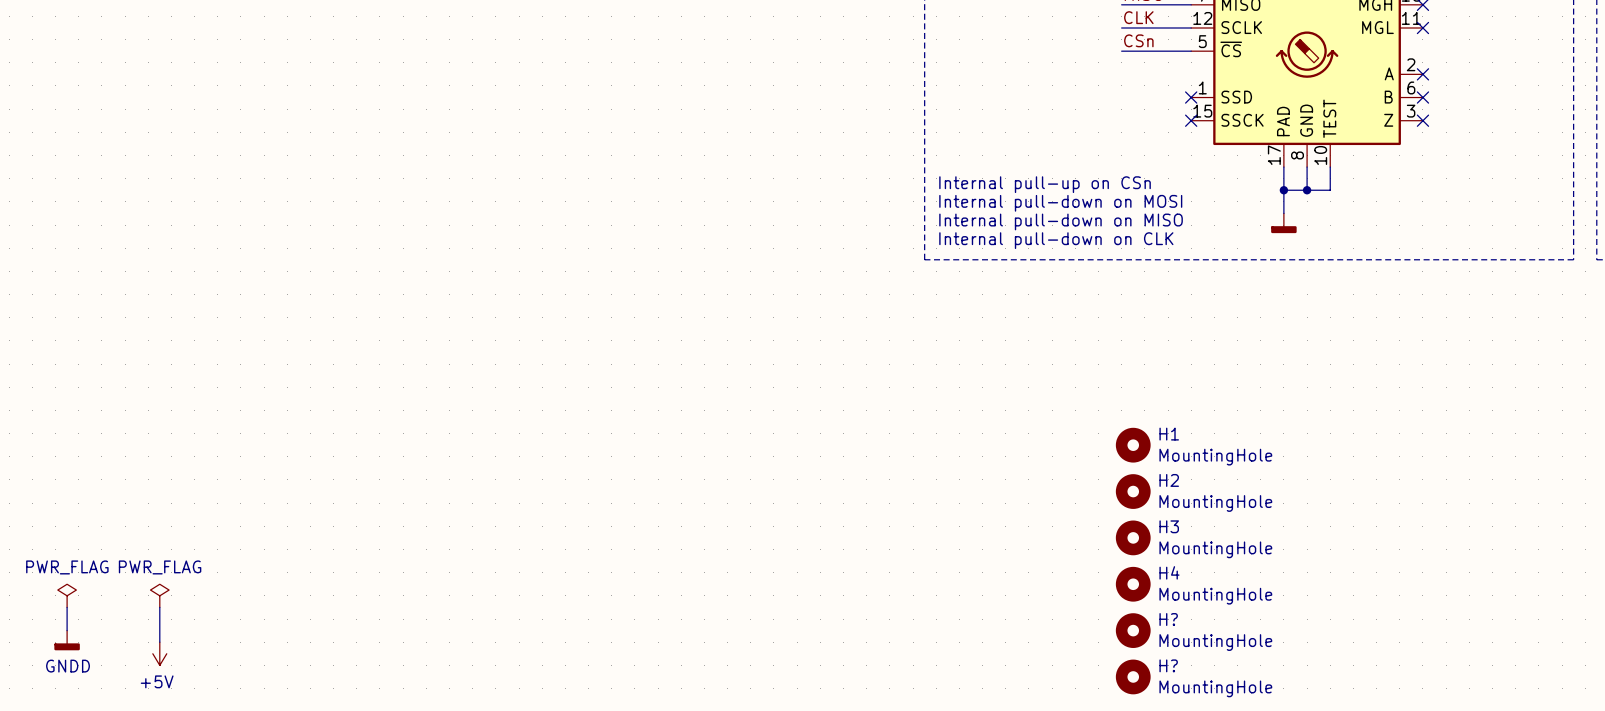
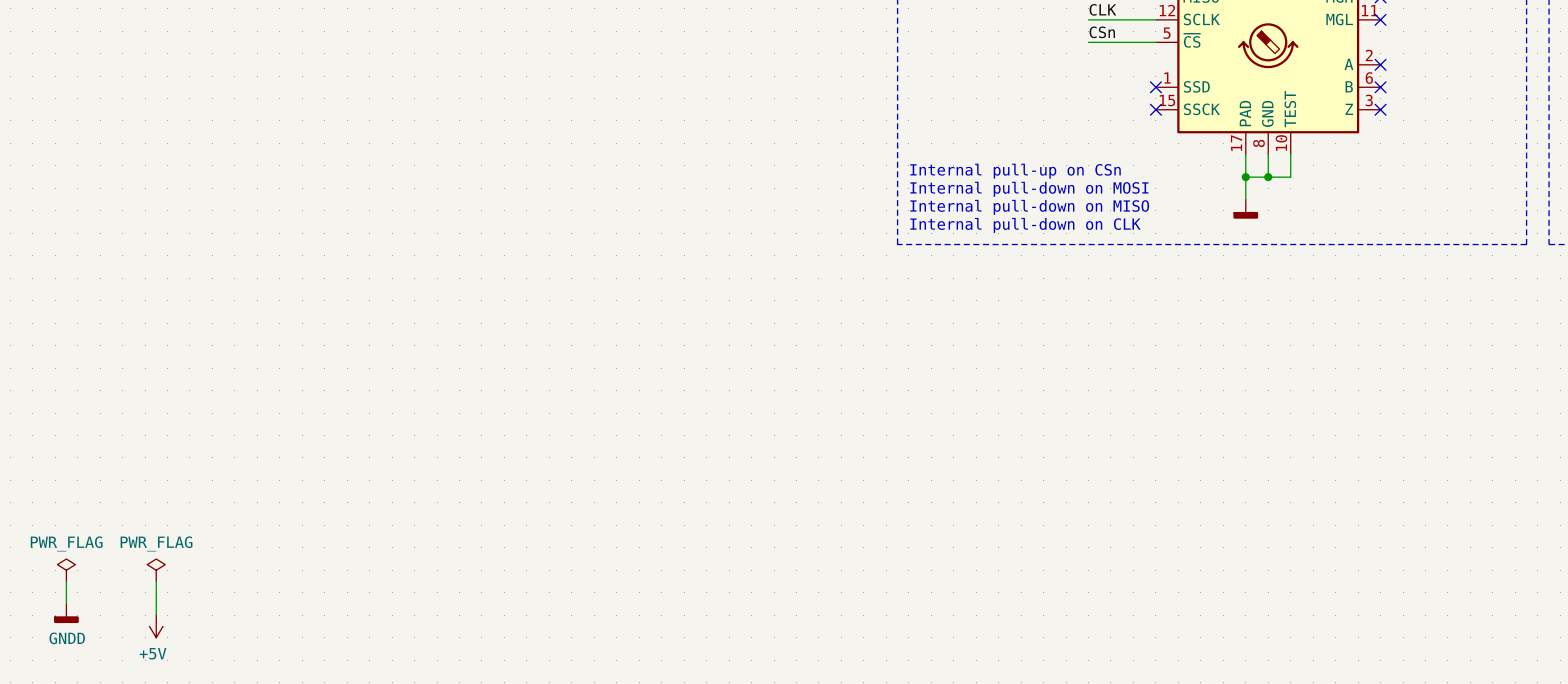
H1: MountingHole (1133, 445) -> none
H2: MountingHole (1133, 491) -> none
H3: MountingHole (1133, 537) -> none
H4: MountingHole (1133, 584) -> none
H?: MountingHole (1133, 630) -> none
H?: MountingHole (1133, 676) -> none

